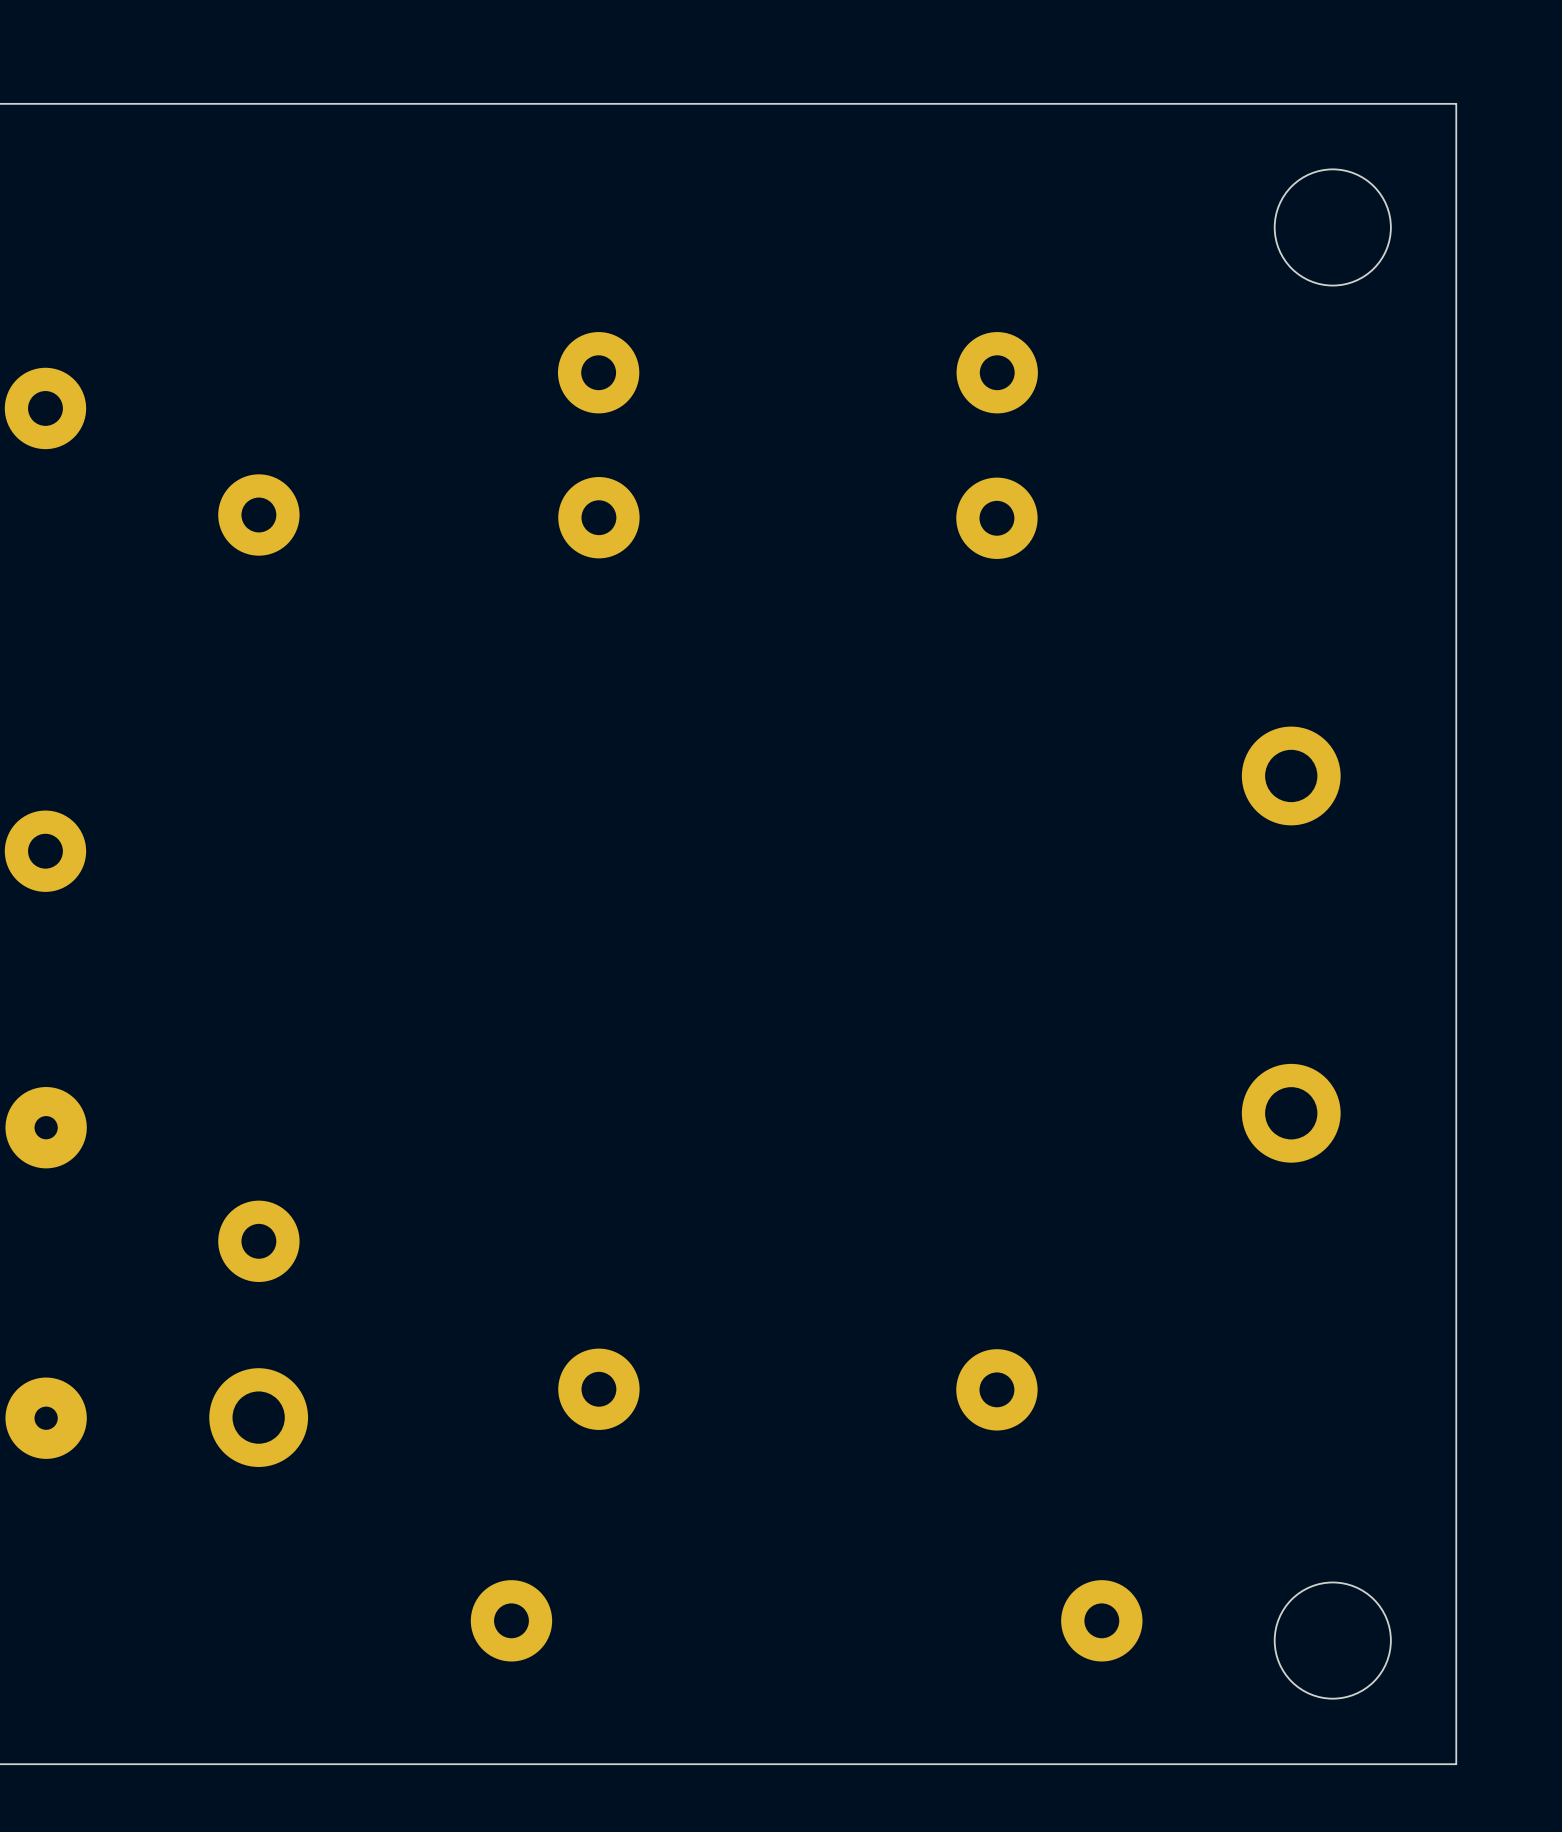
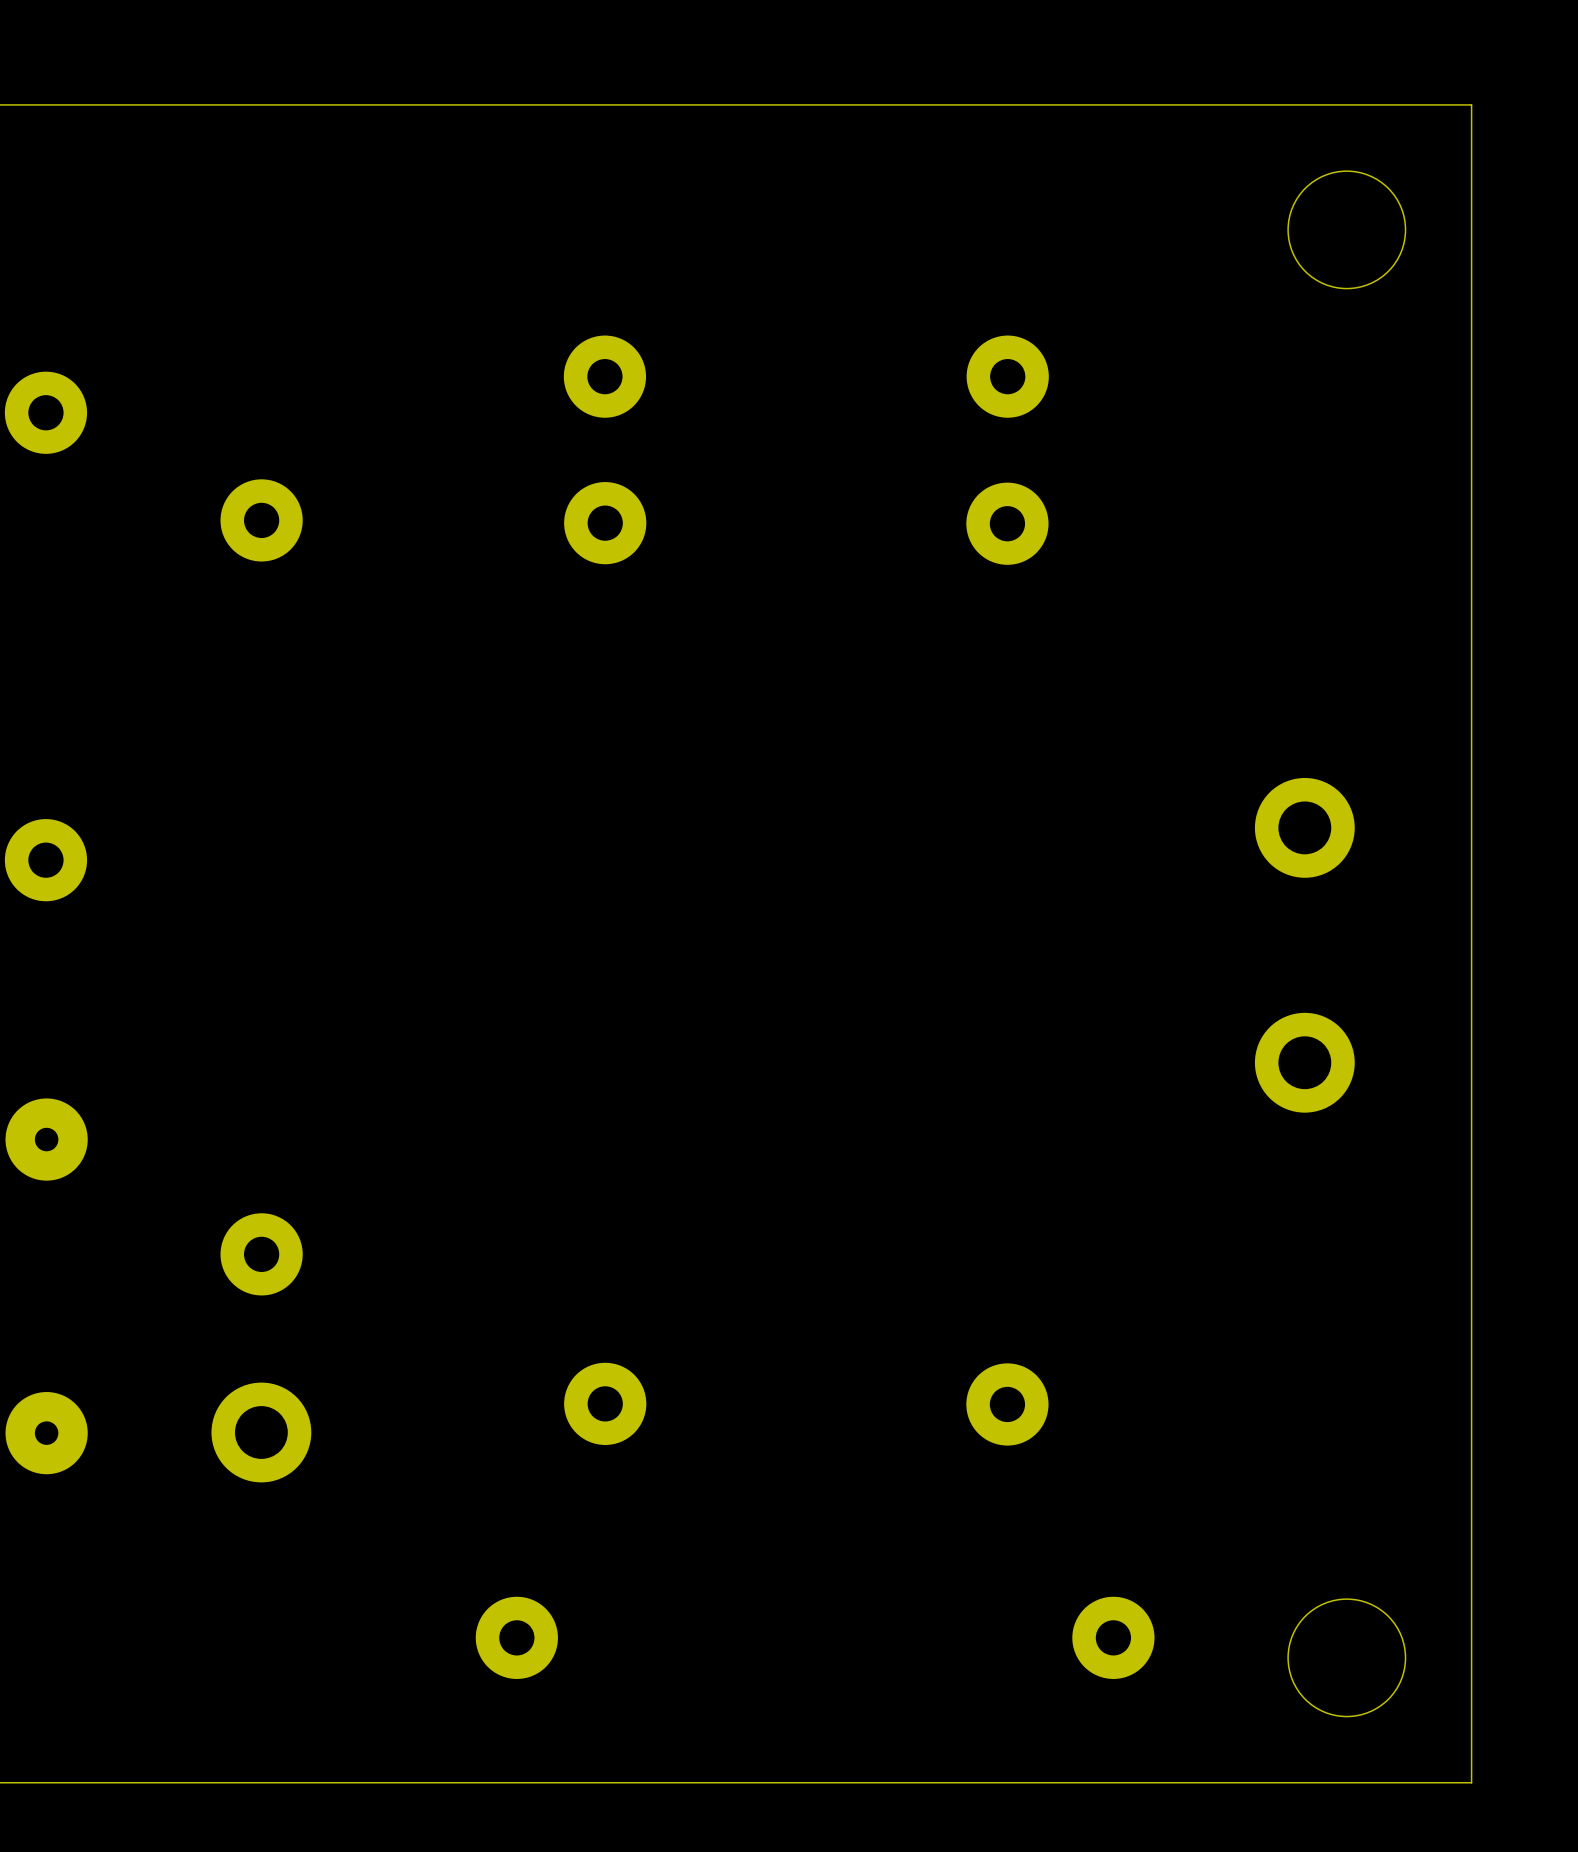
part position: (1291, 775) -> (1304, 827)
part position: (1291, 1113) -> (1304, 1062)

